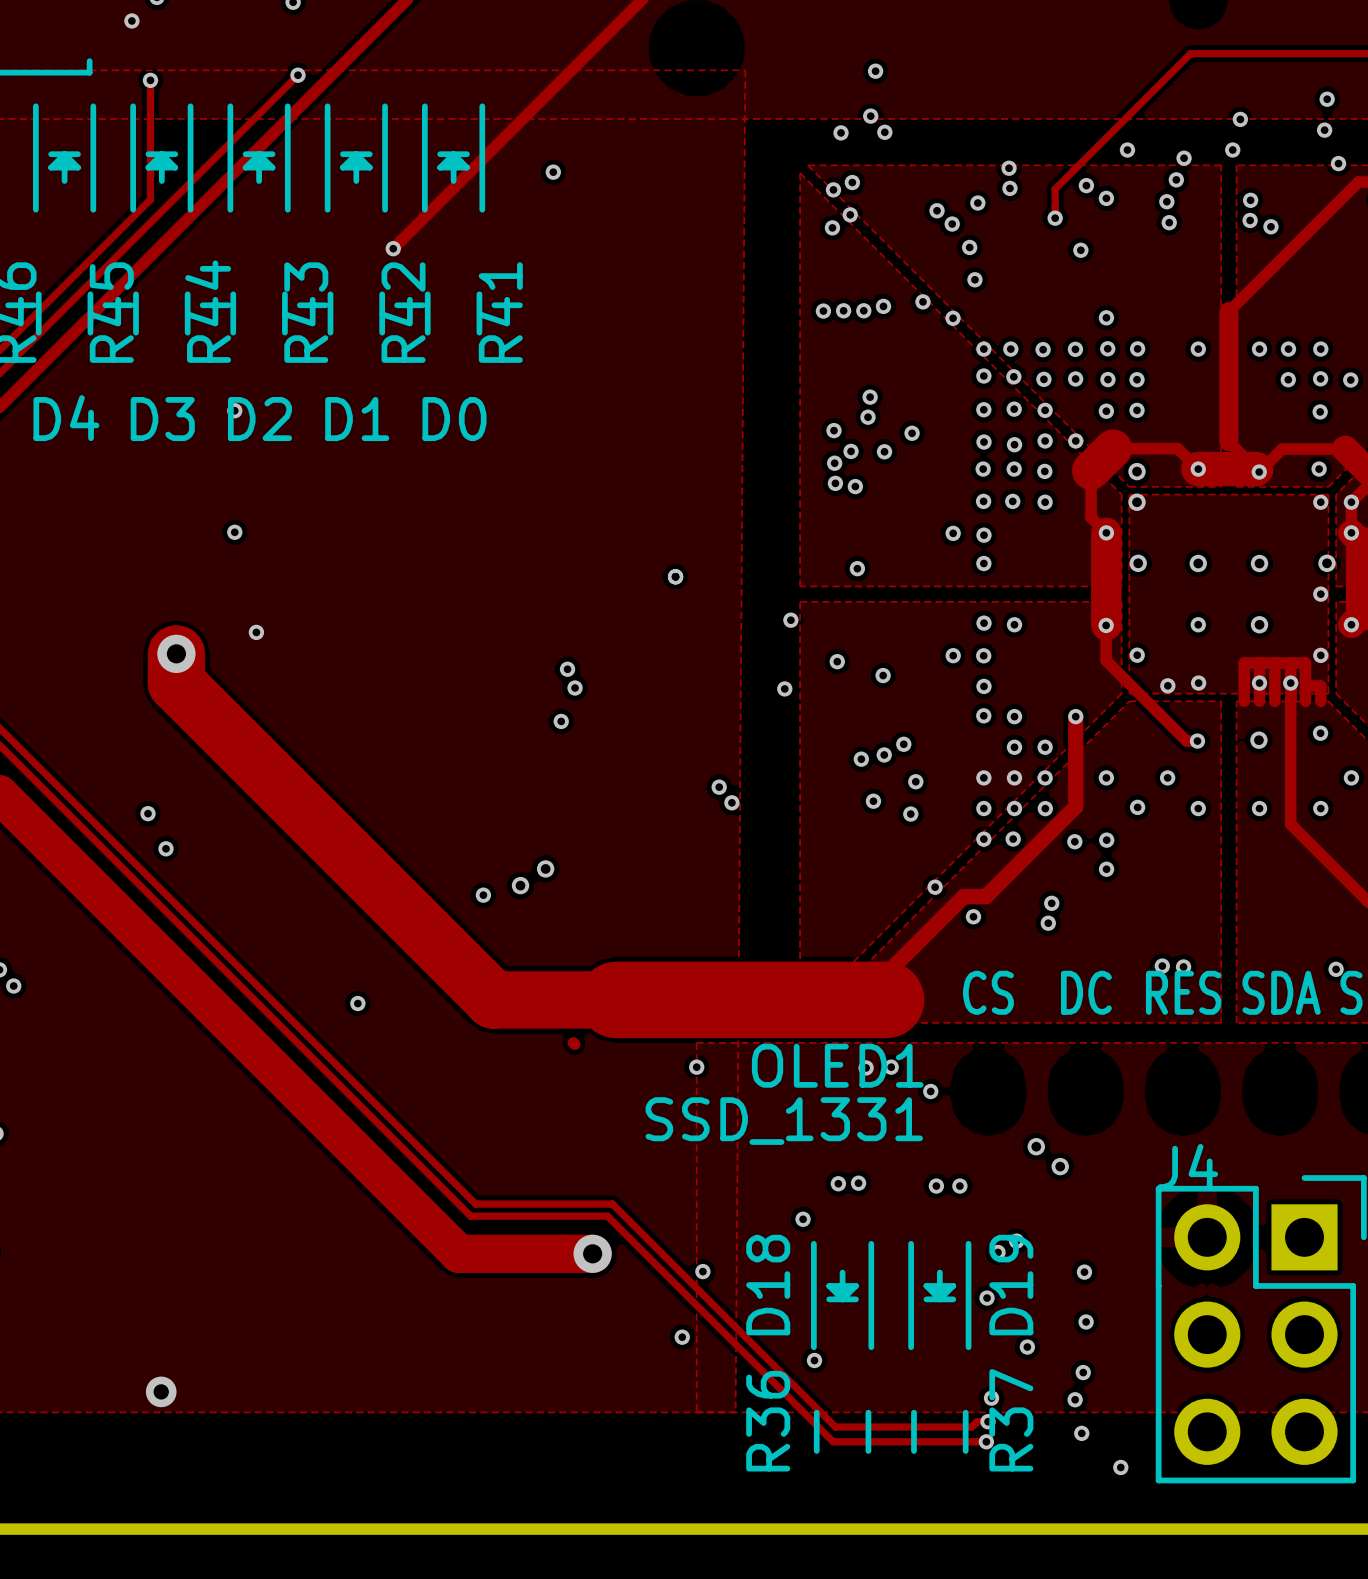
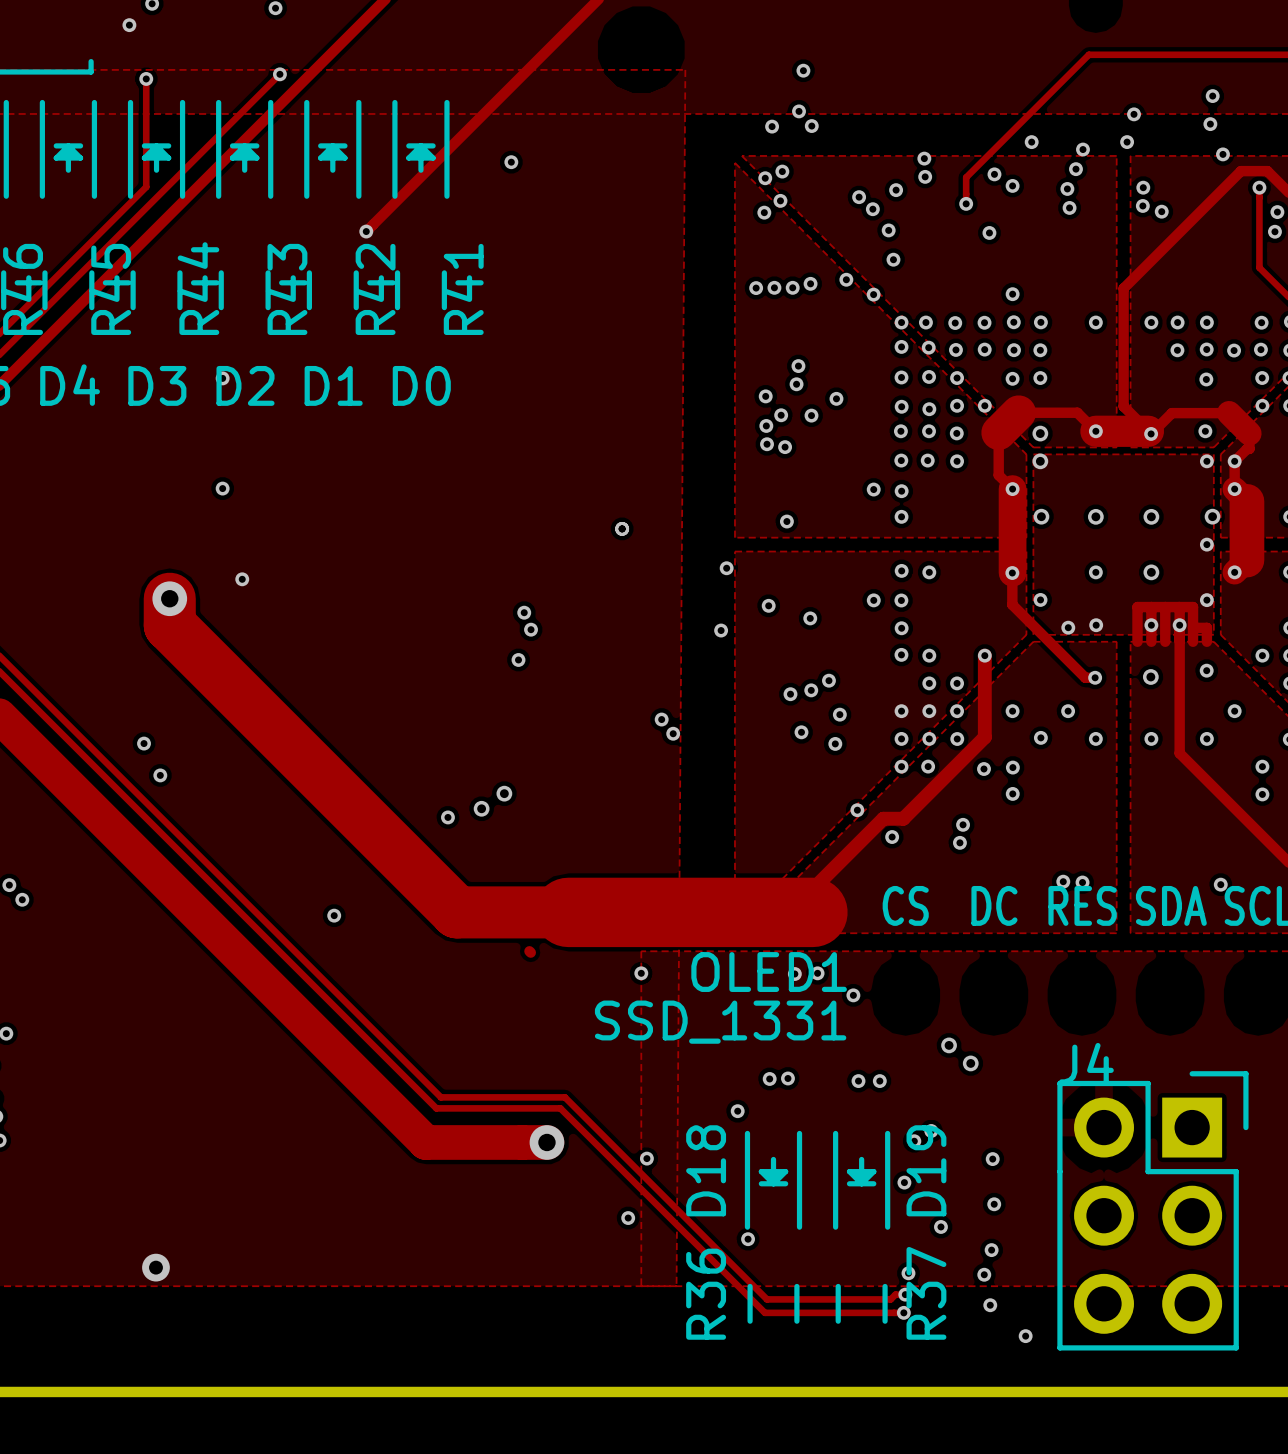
track width: thick (1228, 311) (1228, 441) -> thin (1123, 288) (1123, 406)

